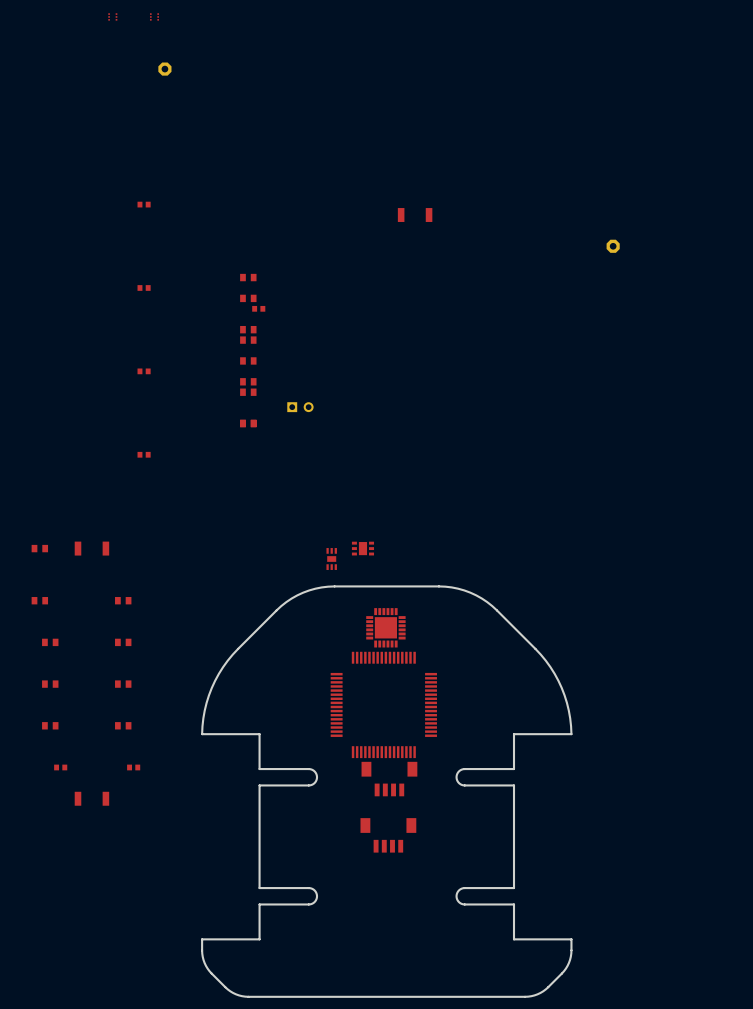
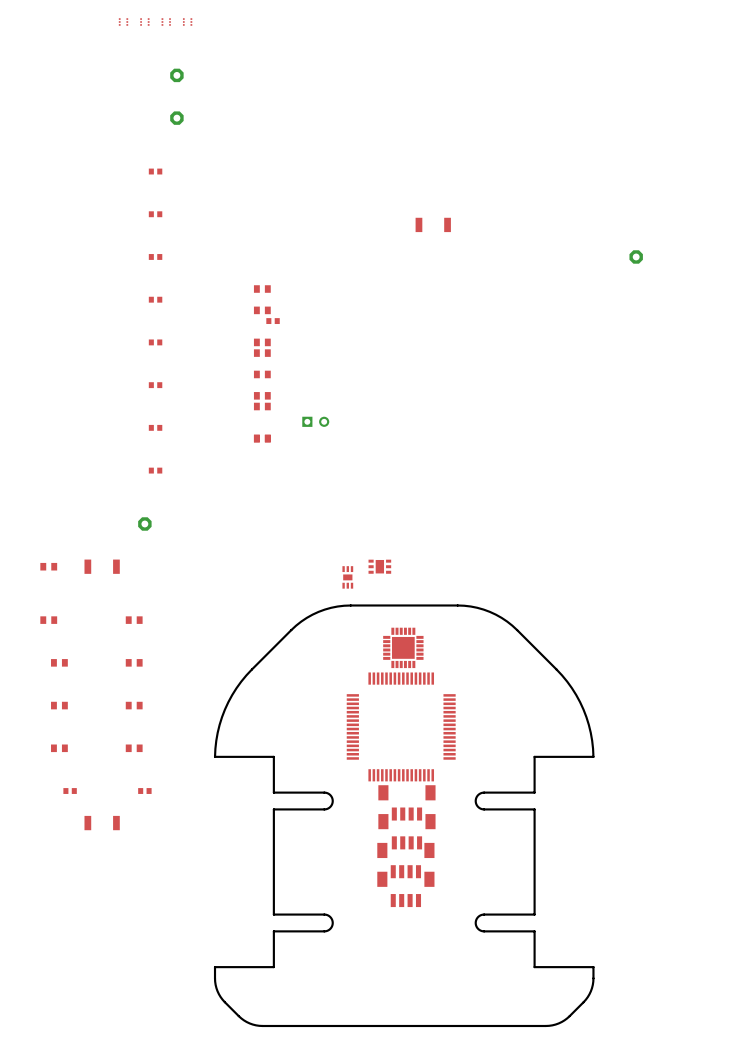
part: none -> (144, 22)
part: none -> (187, 22)
part: none -> (176, 118)
part: none -> (155, 171)
part: none -> (155, 256)
part: none -> (155, 342)
part: none -> (155, 427)
part: none -> (144, 523)
part: none -> (406, 831)
part: none -> (405, 889)

